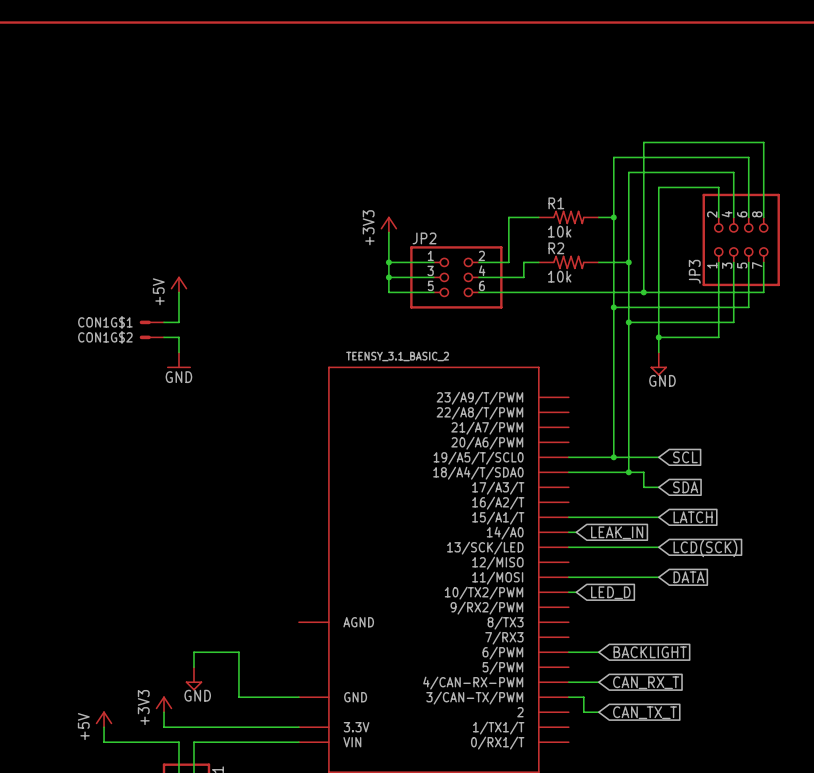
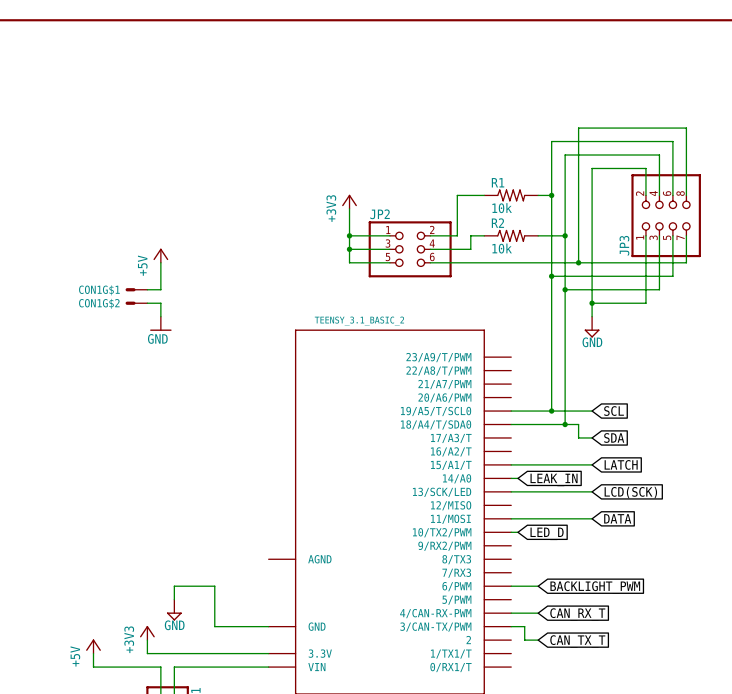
global label: BACKLIGHT (650, 652) -> BACKLIGHT_PWM (595, 587)

